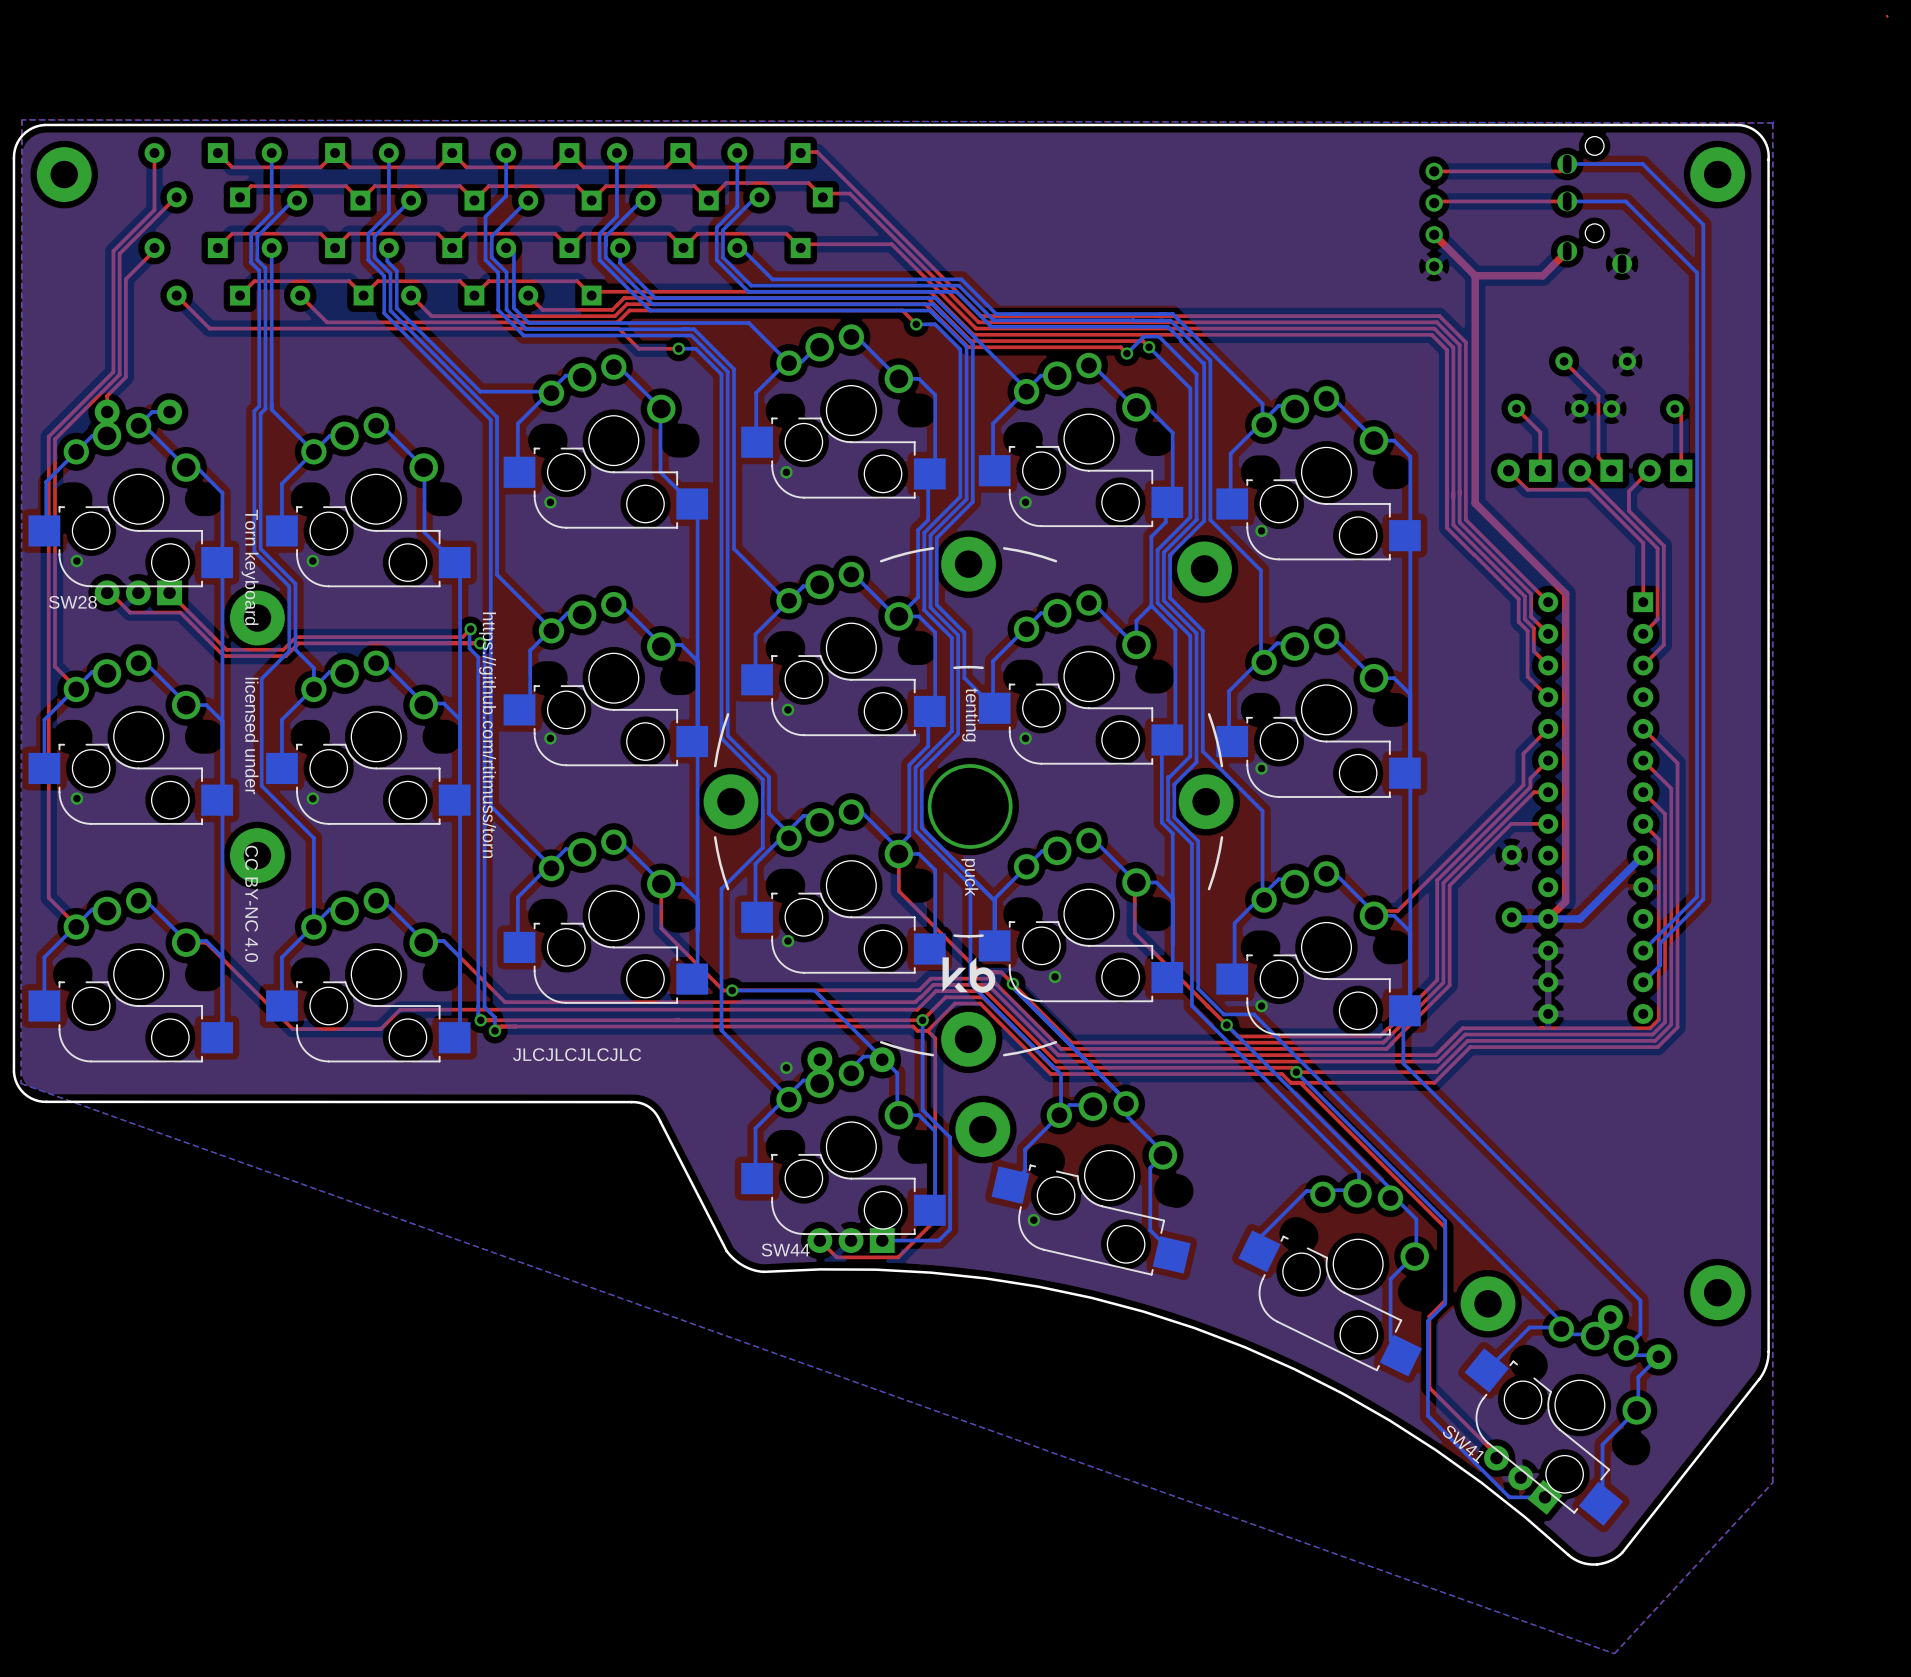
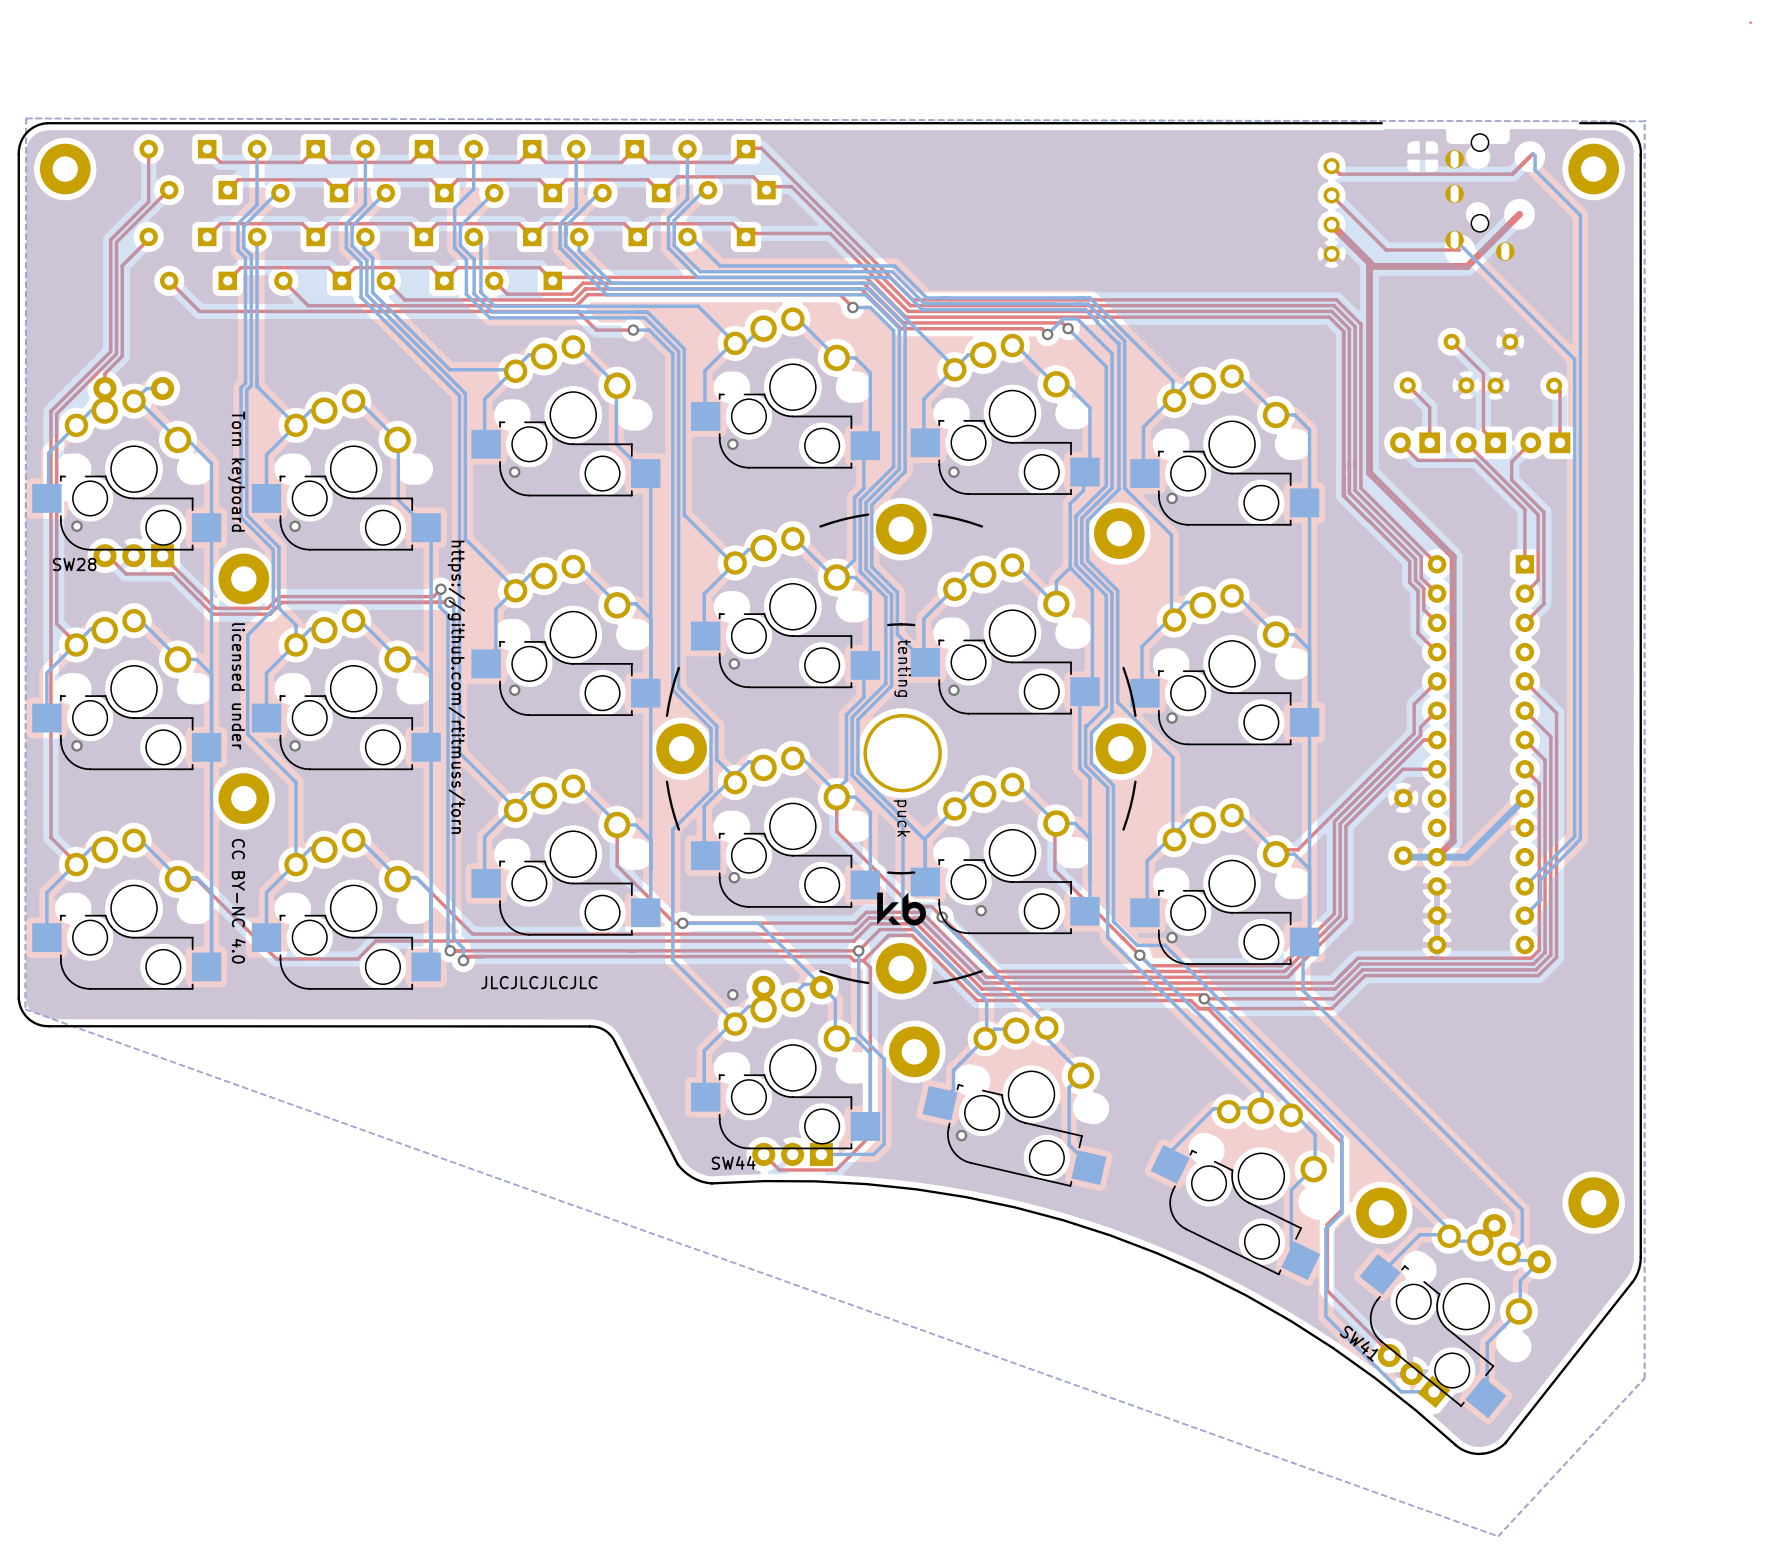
board edge: (1702, 124) (1488, 124) -> none
bottom track: (1567, 164) (1642, 164) (1654, 175) -> (1532, 153) (1535, 156) (1535, 170)
top track: (1567, 164) (1559, 171) (1434, 171) -> (1532, 153) (1512, 174) (1339, 174) (1331, 166)
bottom track: (1567, 201) (1625, 201) (1697, 272) (1697, 380) -> (1462, 247) (1574, 359)
top track: (1567, 201) (1435, 201) (1434, 203) -> (1459, 250) (1386, 250) (1331, 195)
top track: (1567, 251) (1542, 275) (1475, 275) -> (1519, 214) (1467, 266) (1373, 266) (1369, 262)

